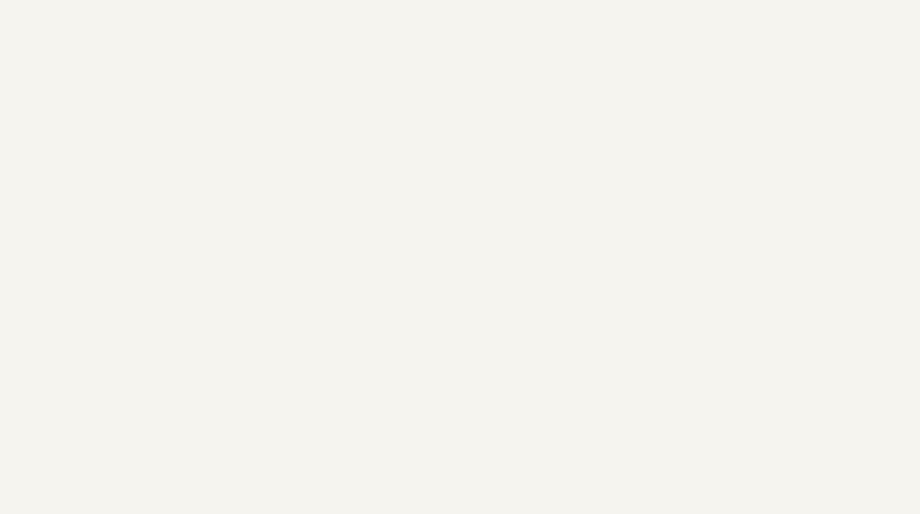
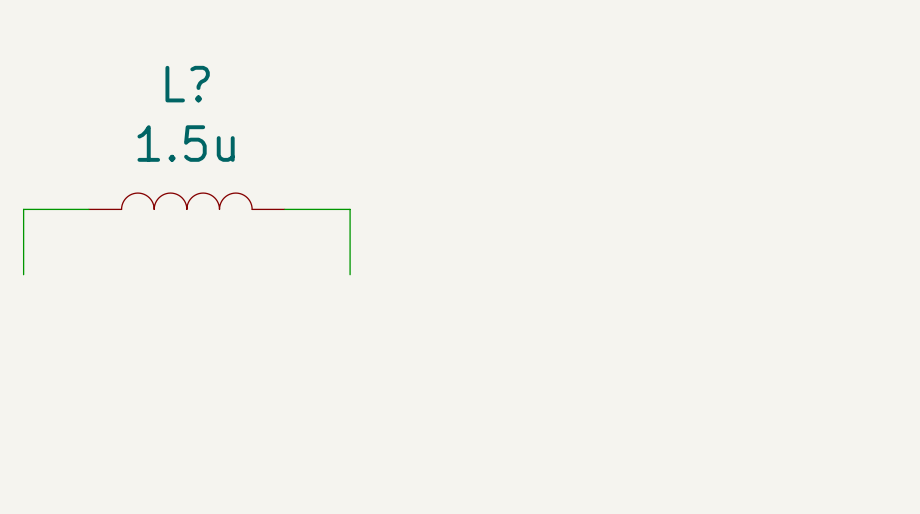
L?: none -> 1.5u (186, 201)
wire: none -> (88, 209) (23, 209) (23, 274)
wire: none -> (284, 209) (350, 209) (350, 274)

